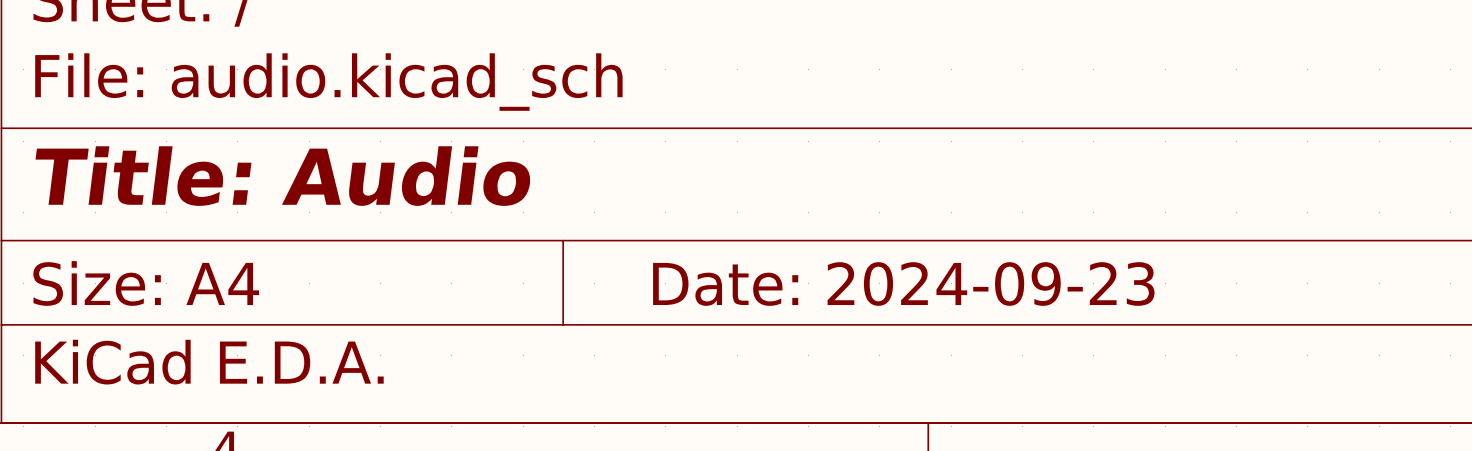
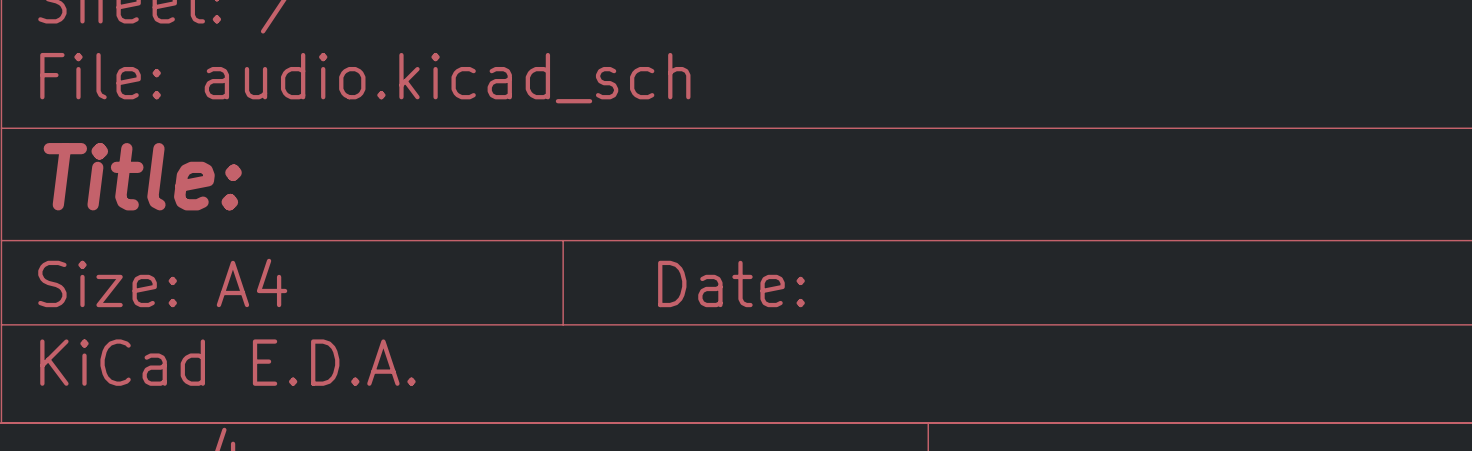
title block: Title: Audio (283, 176) -> Title: (142, 176)
title block: Date: 2024-09-23 (903, 284) -> Date: (731, 283)

